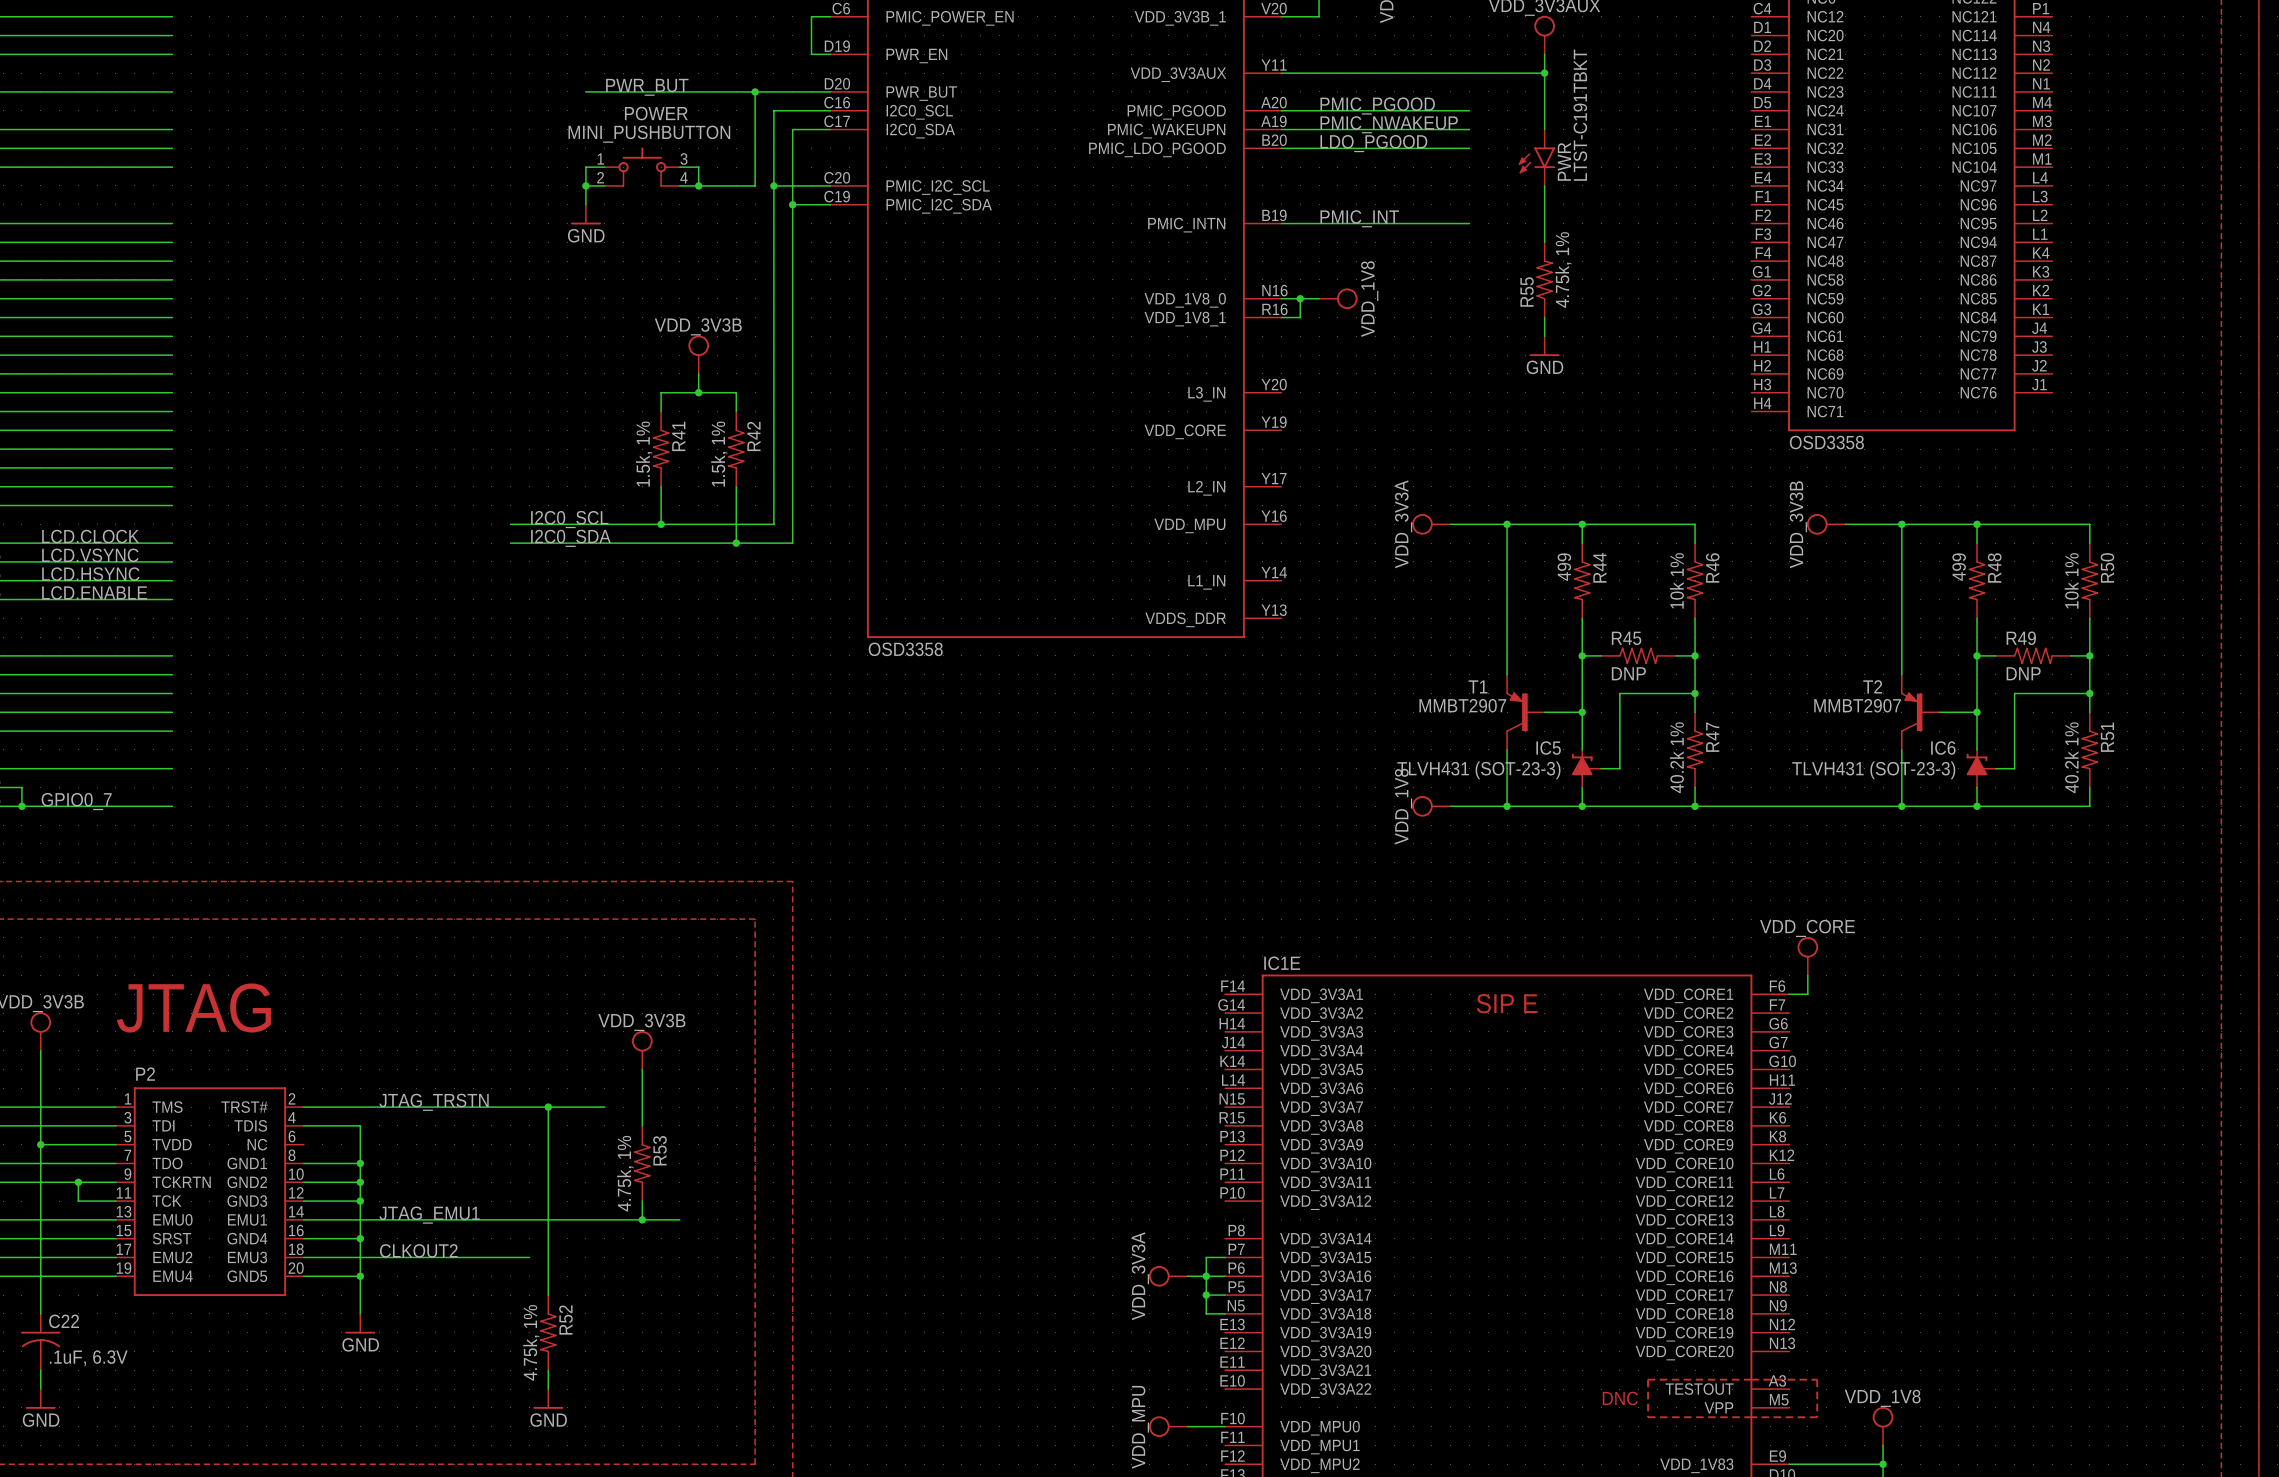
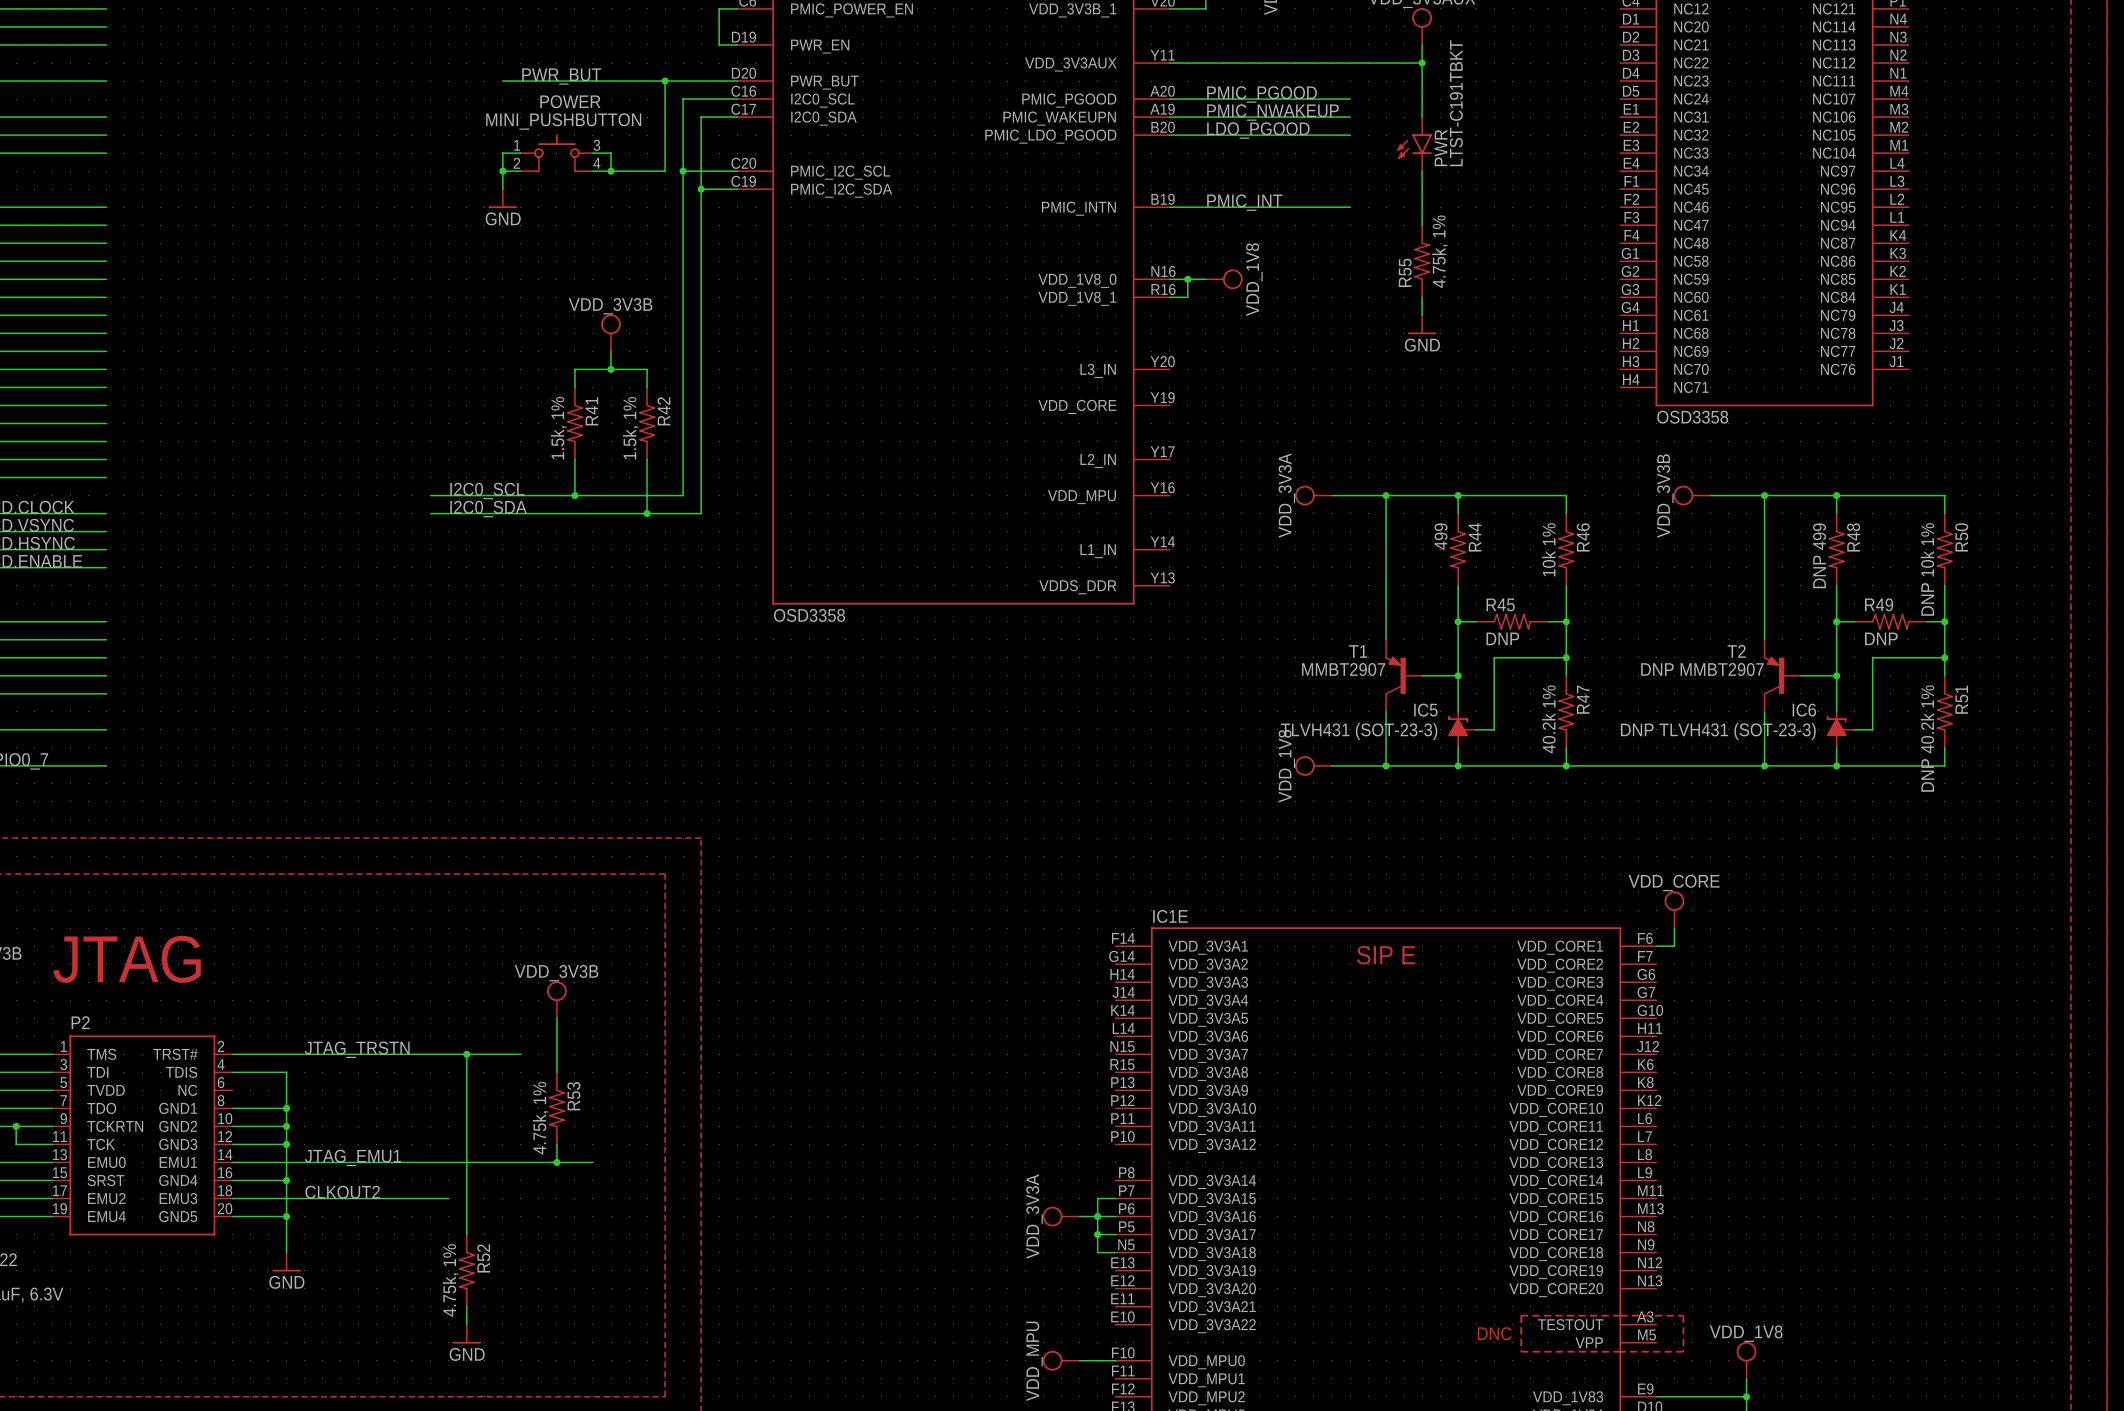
R48 value: 499 (1959, 567) -> DNP 499 (1819, 555)
R50 value: 10k 1% (2071, 580) -> DNP 10k 1% (1927, 569)
T2 value: MMBT2907 (1857, 705) -> DNP MMBT2907 (1702, 669)
R51 value: 40.2k 1% (2071, 757) -> DNP 40.2k 1% (1927, 738)
IC6 value: TLVH431 (SOT-23-3) (1873, 770) -> DNP TLVH431 (SOT-23-3) (1718, 731)

